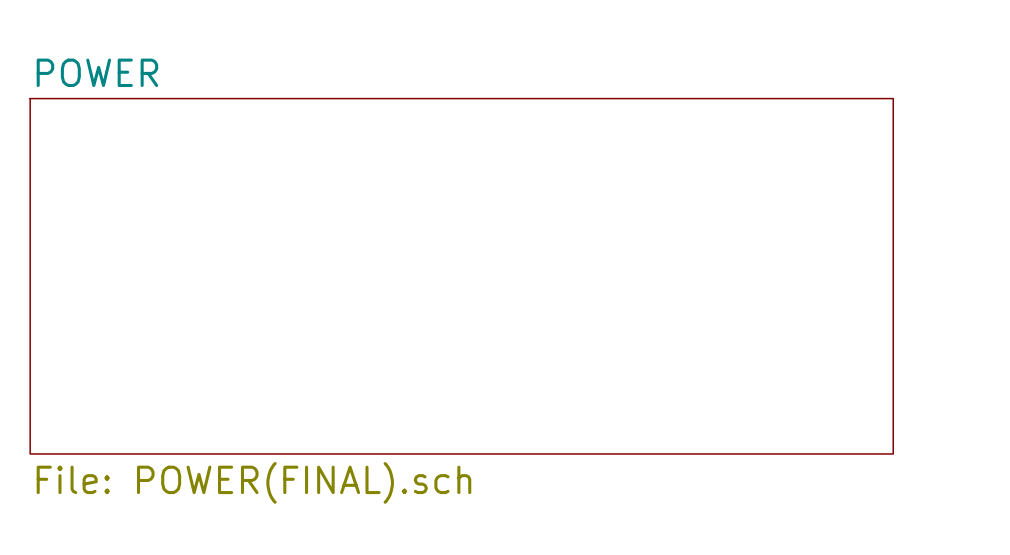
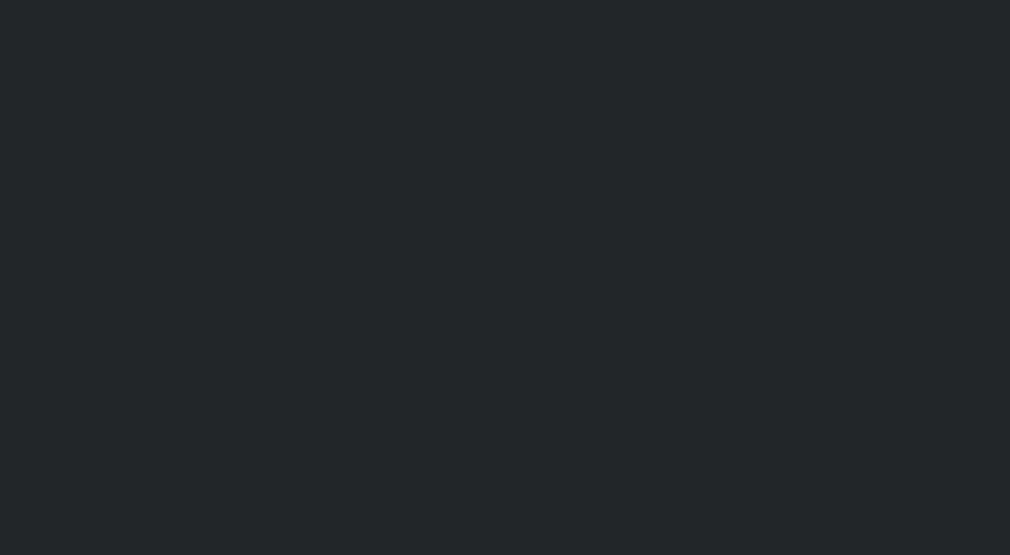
sheet POWER: File: POWER(FINAL).sch (461, 276) -> none

